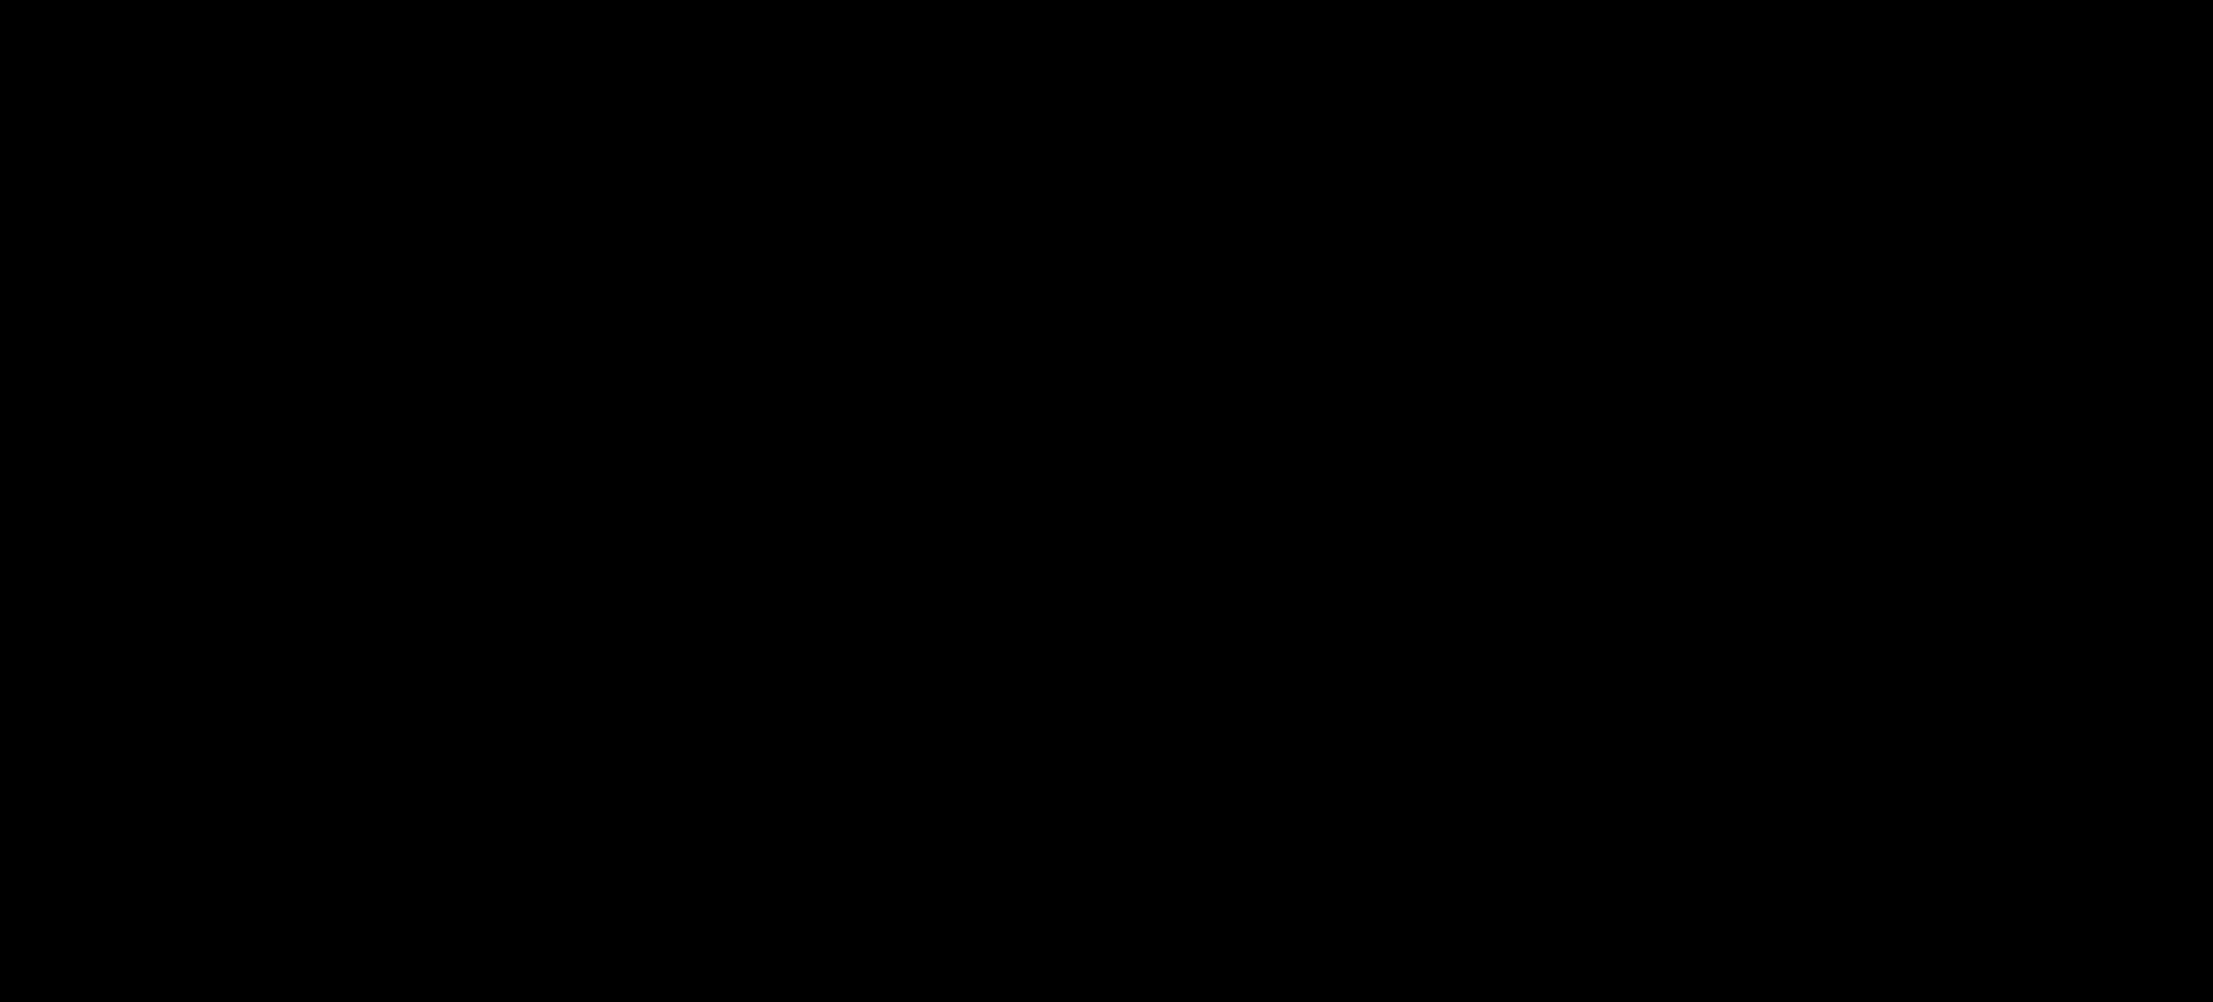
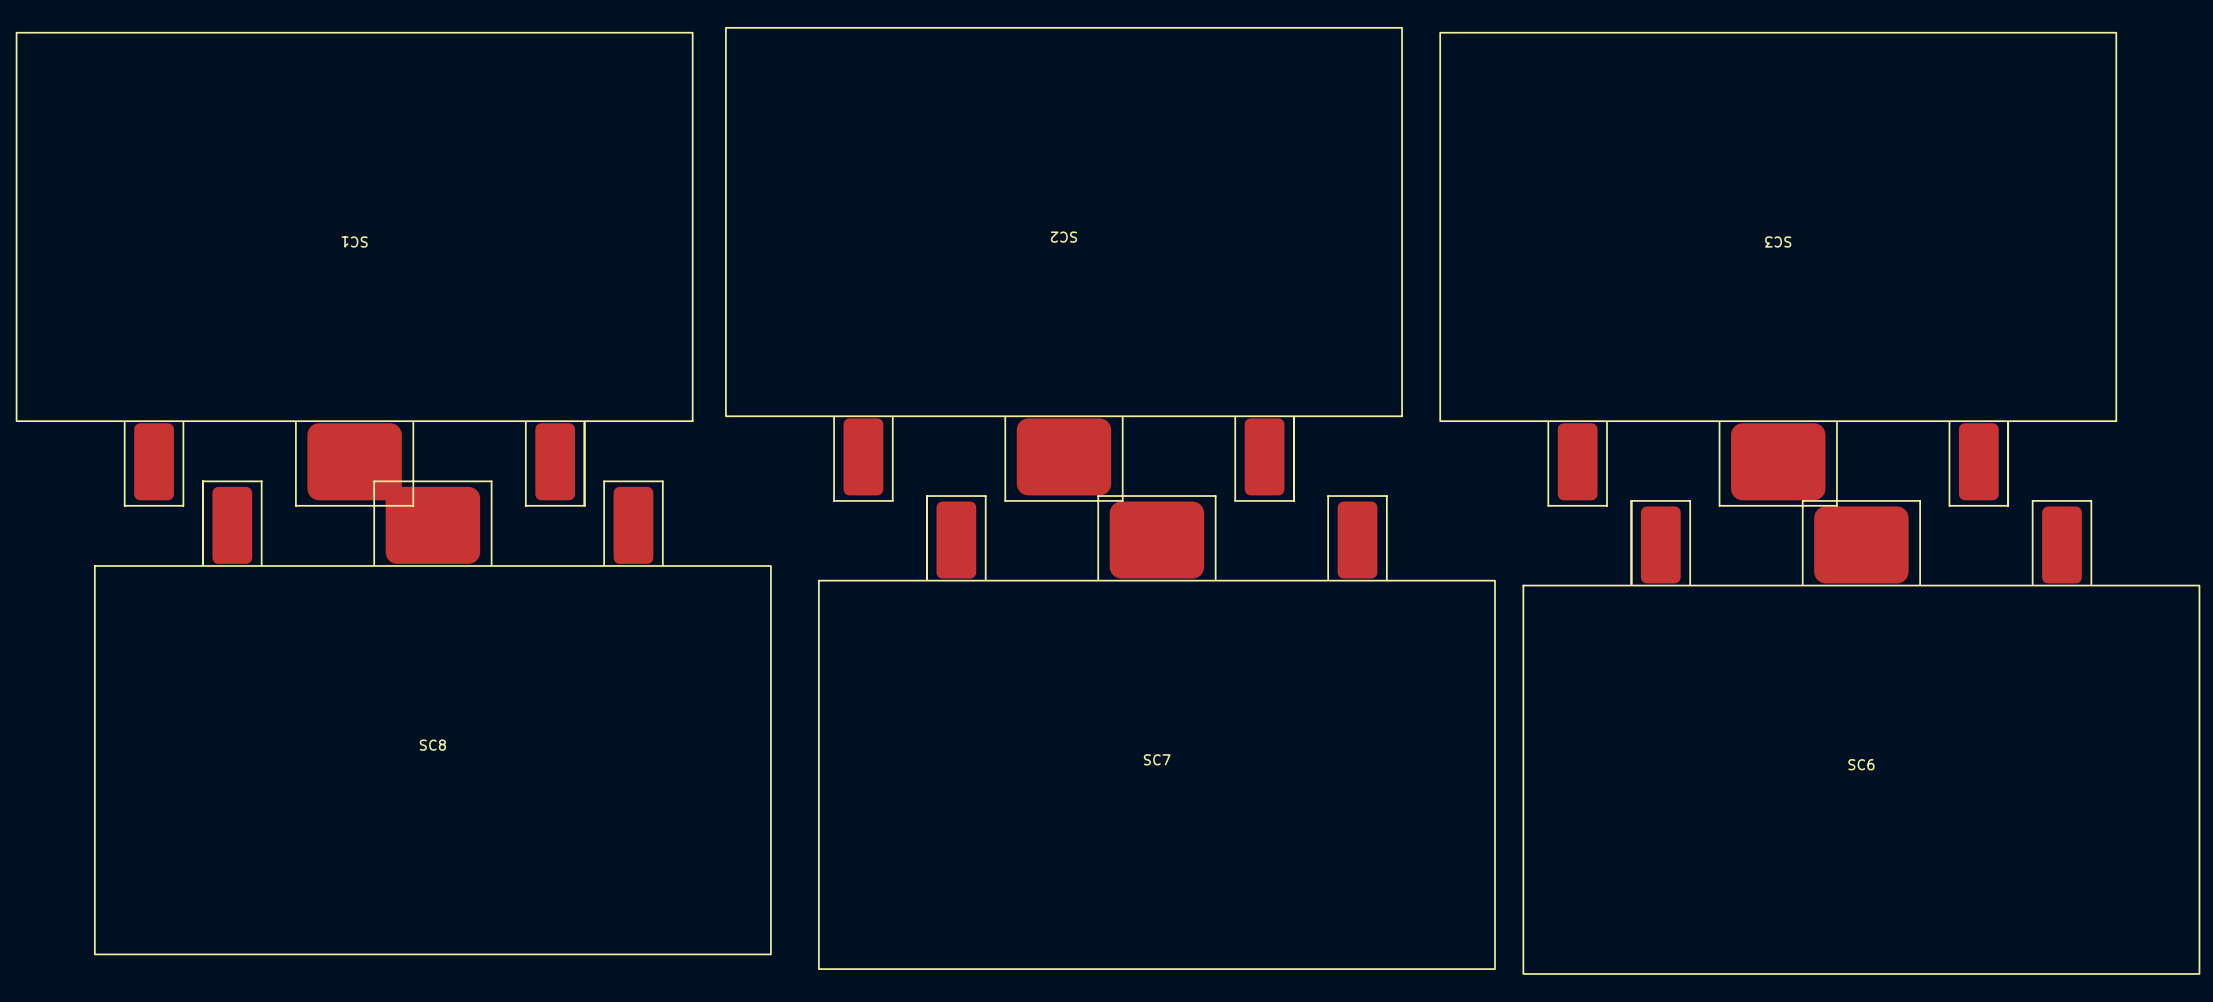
SC2: none -> (1063, 264)
SC1: none -> (354, 269)
SC3: none -> (1778, 269)
SC8: none -> (432, 717)
SC7: none -> (1156, 732)
SC6: none -> (1861, 737)

